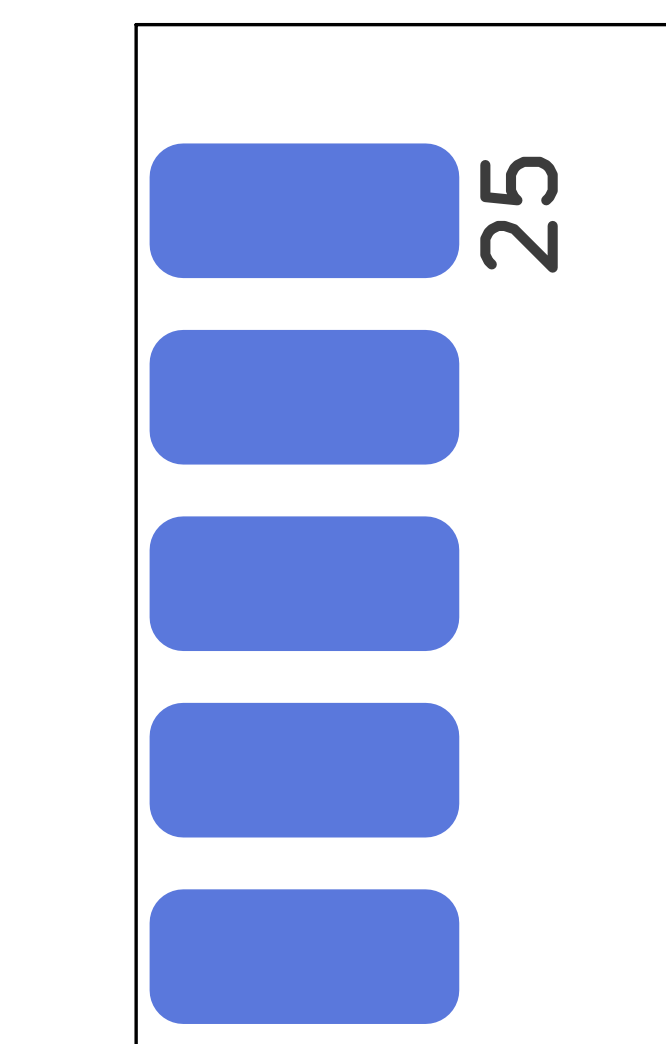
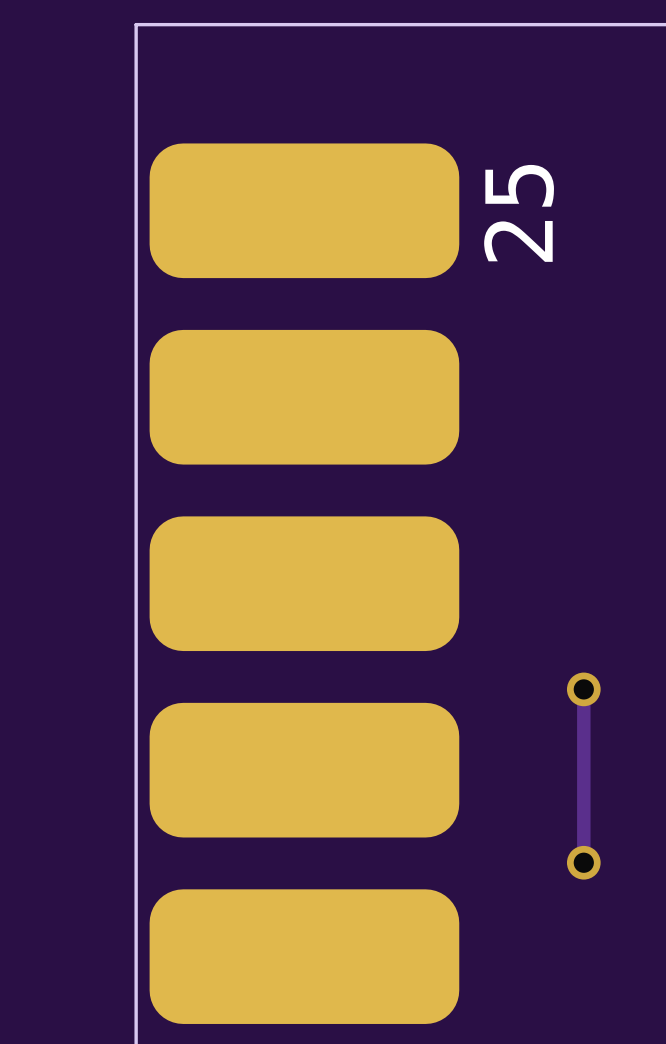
track: none -> (583, 689) (583, 862)
via: none -> (583, 689)
via: none -> (583, 862)

